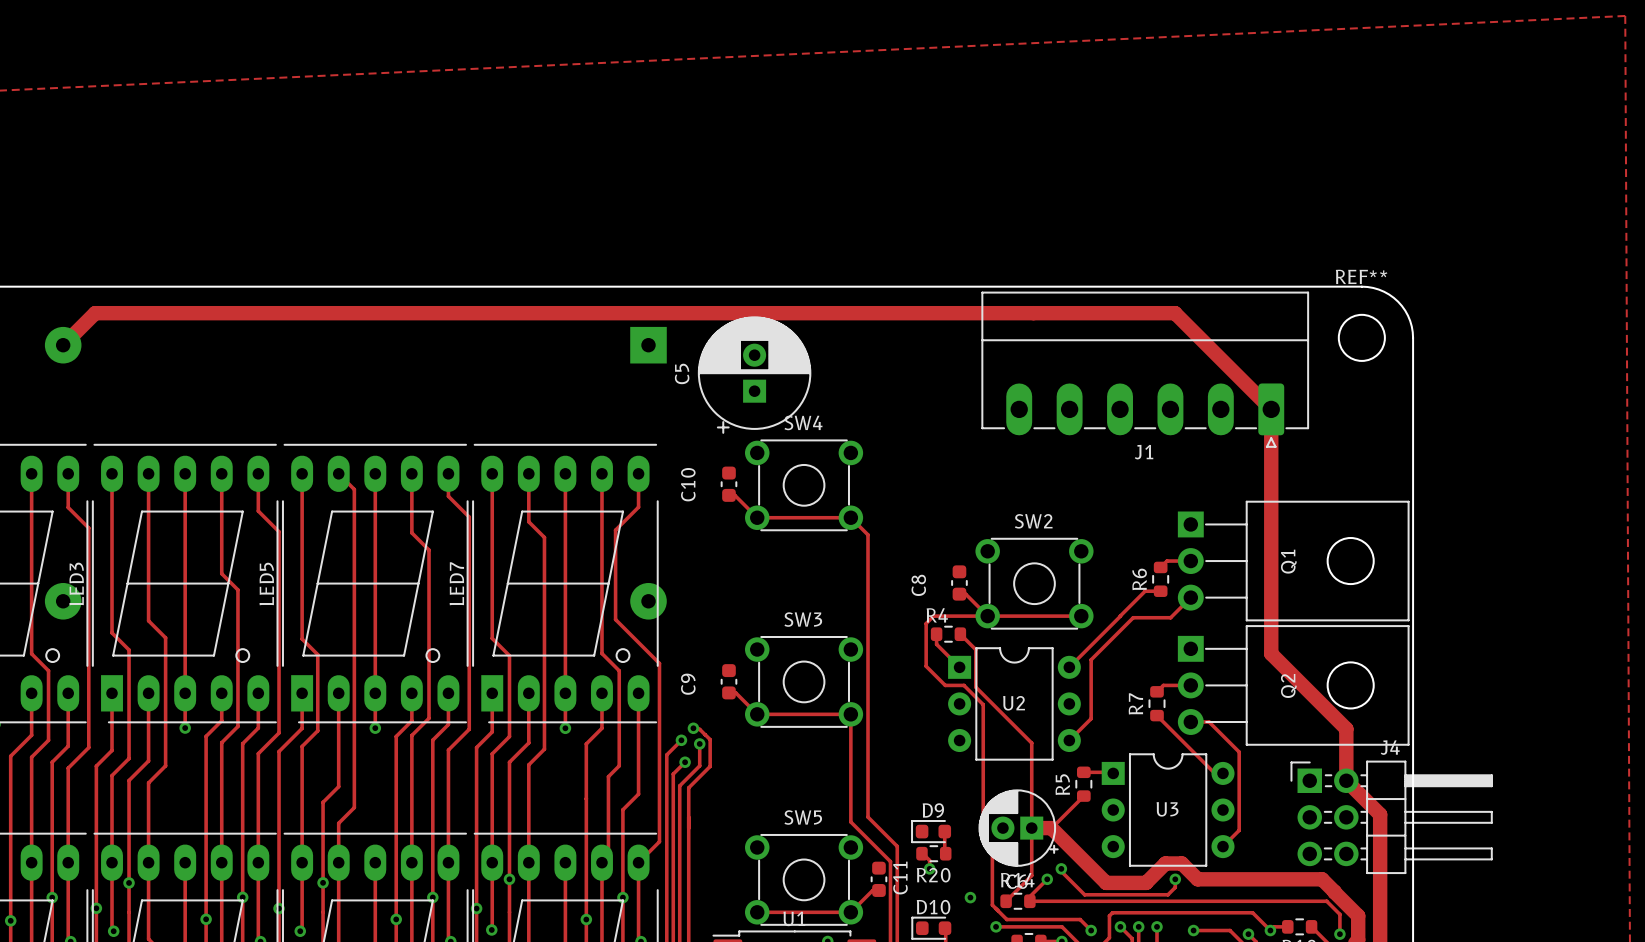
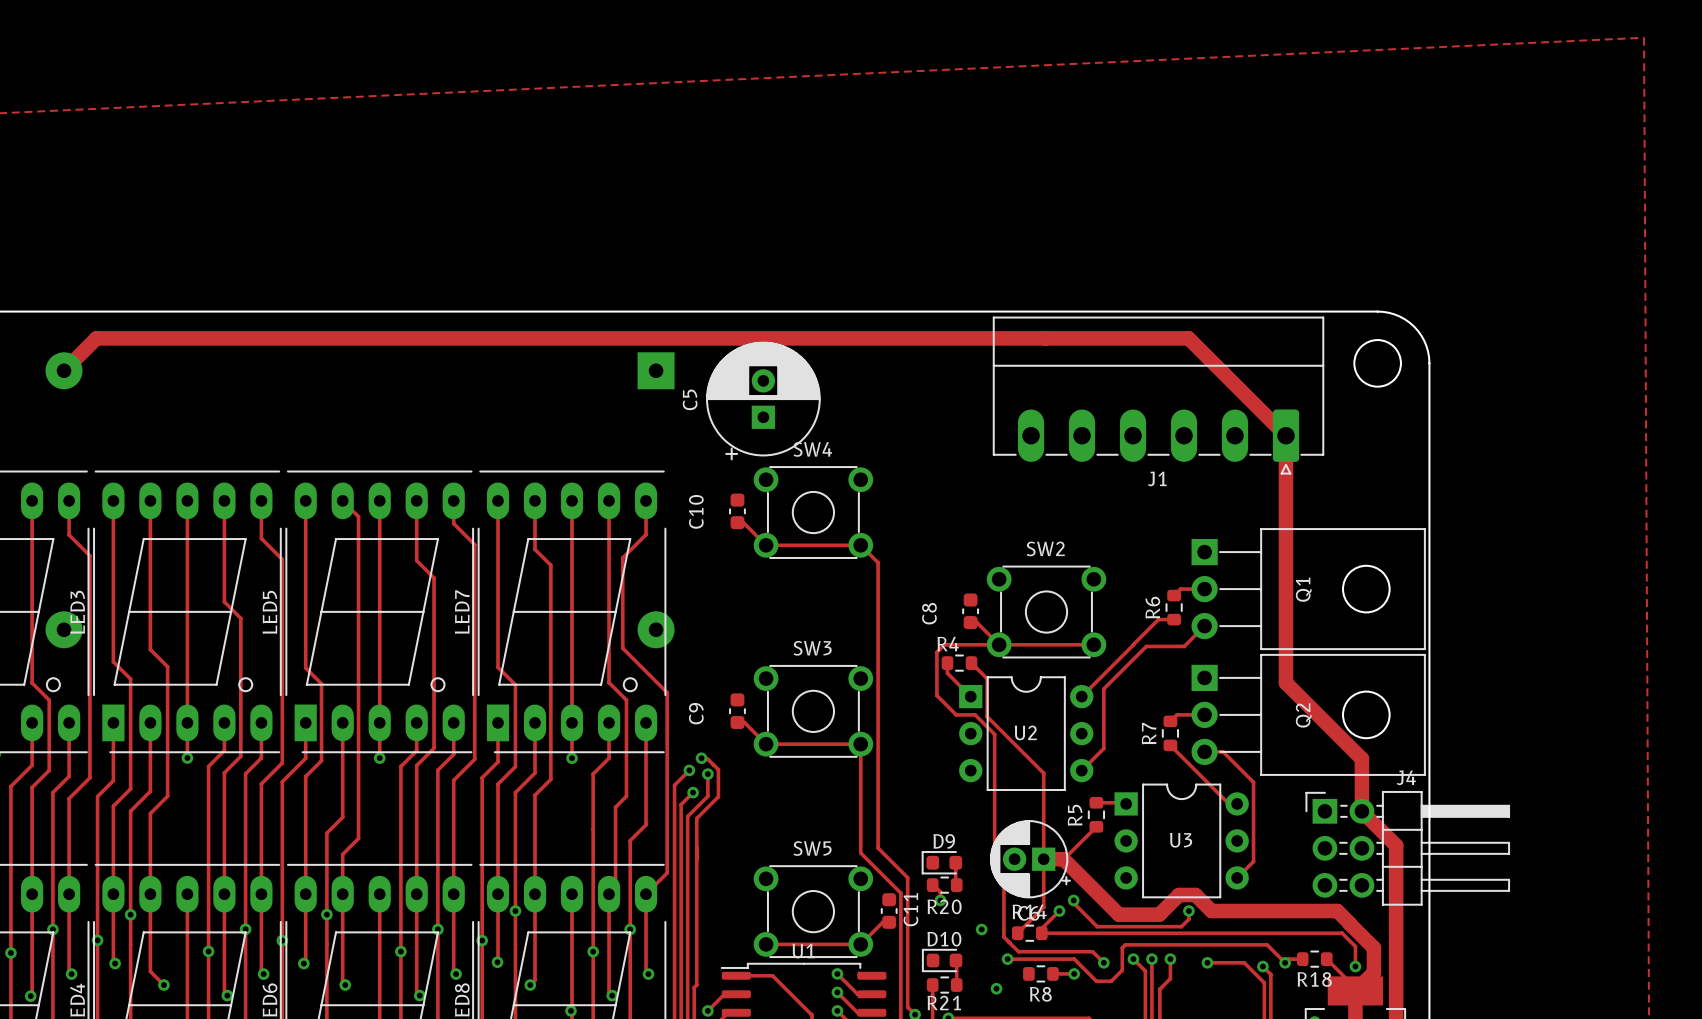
REF** name: REF** (1361, 276) -> none

